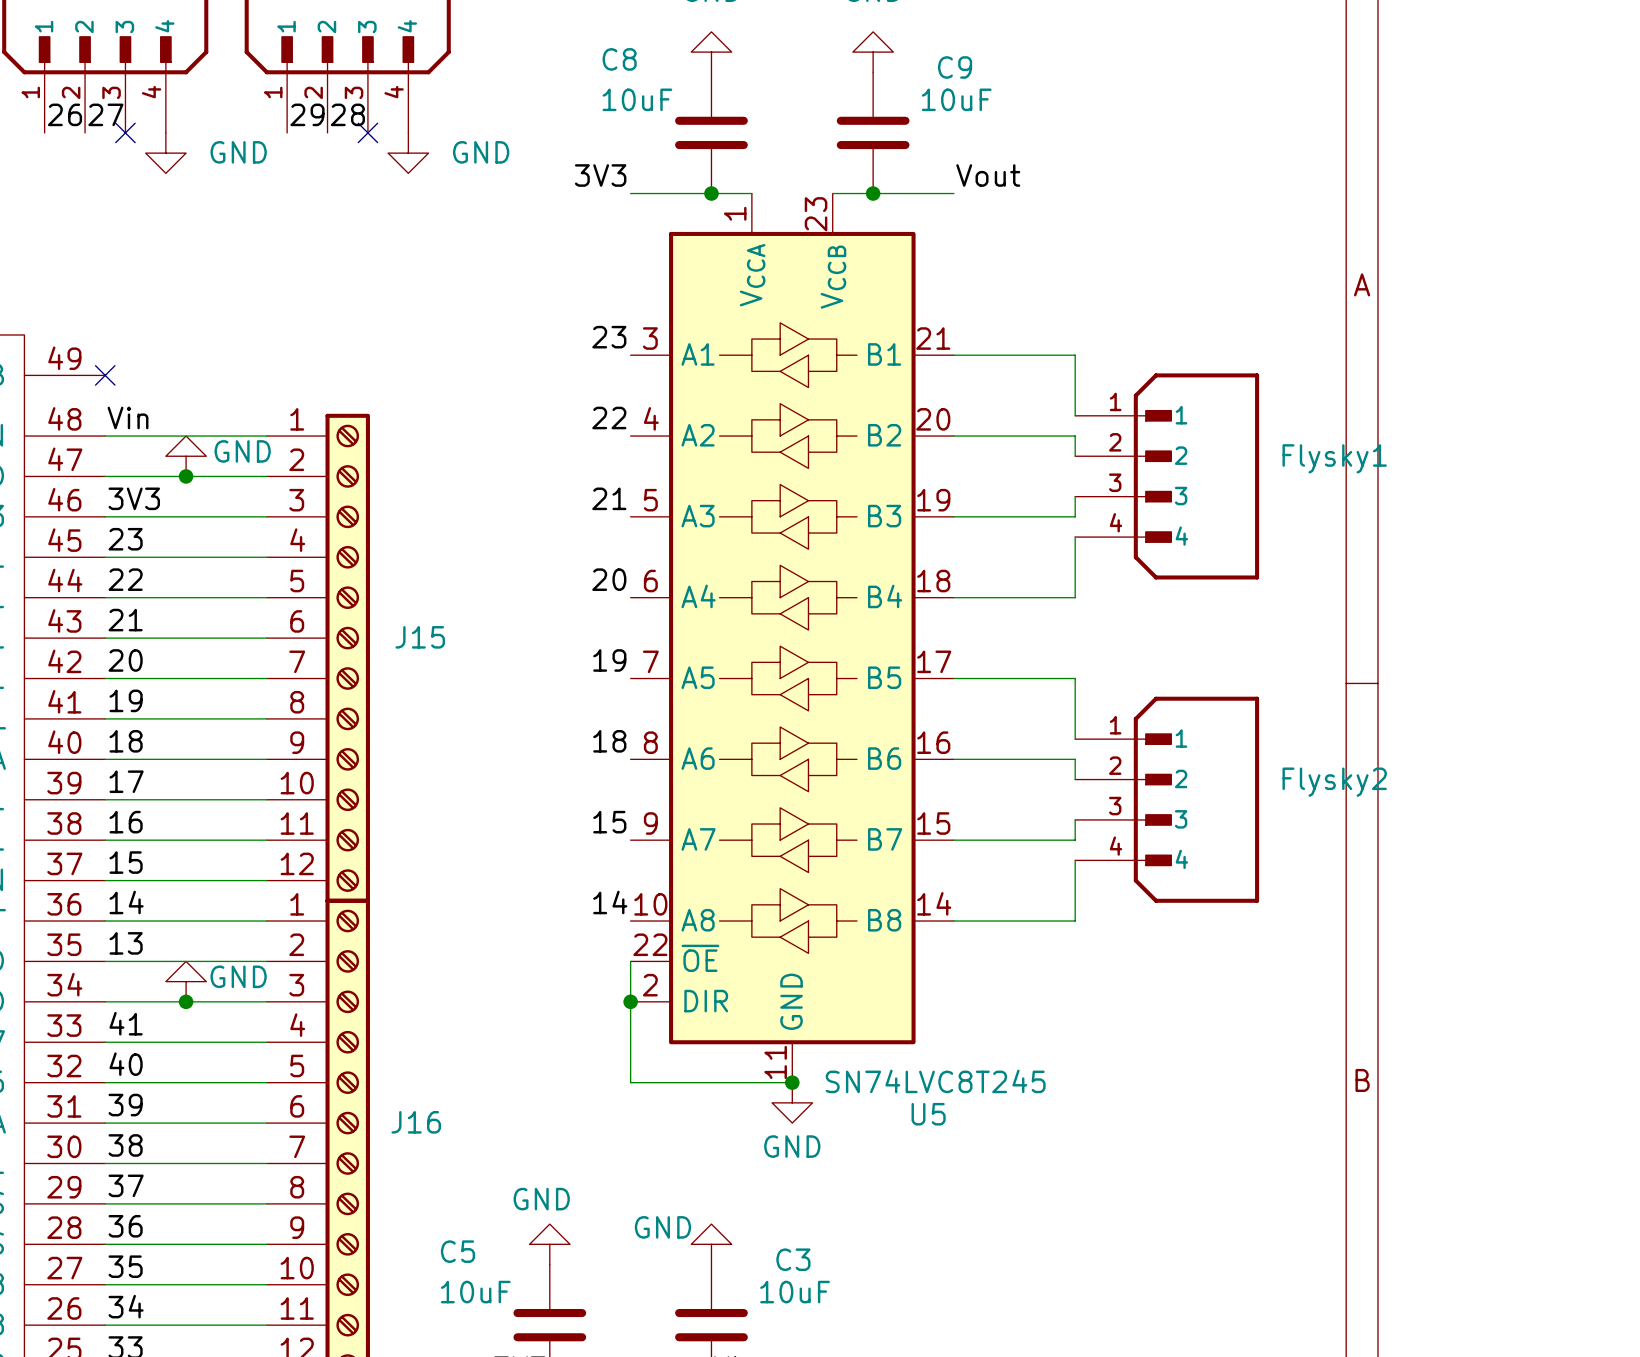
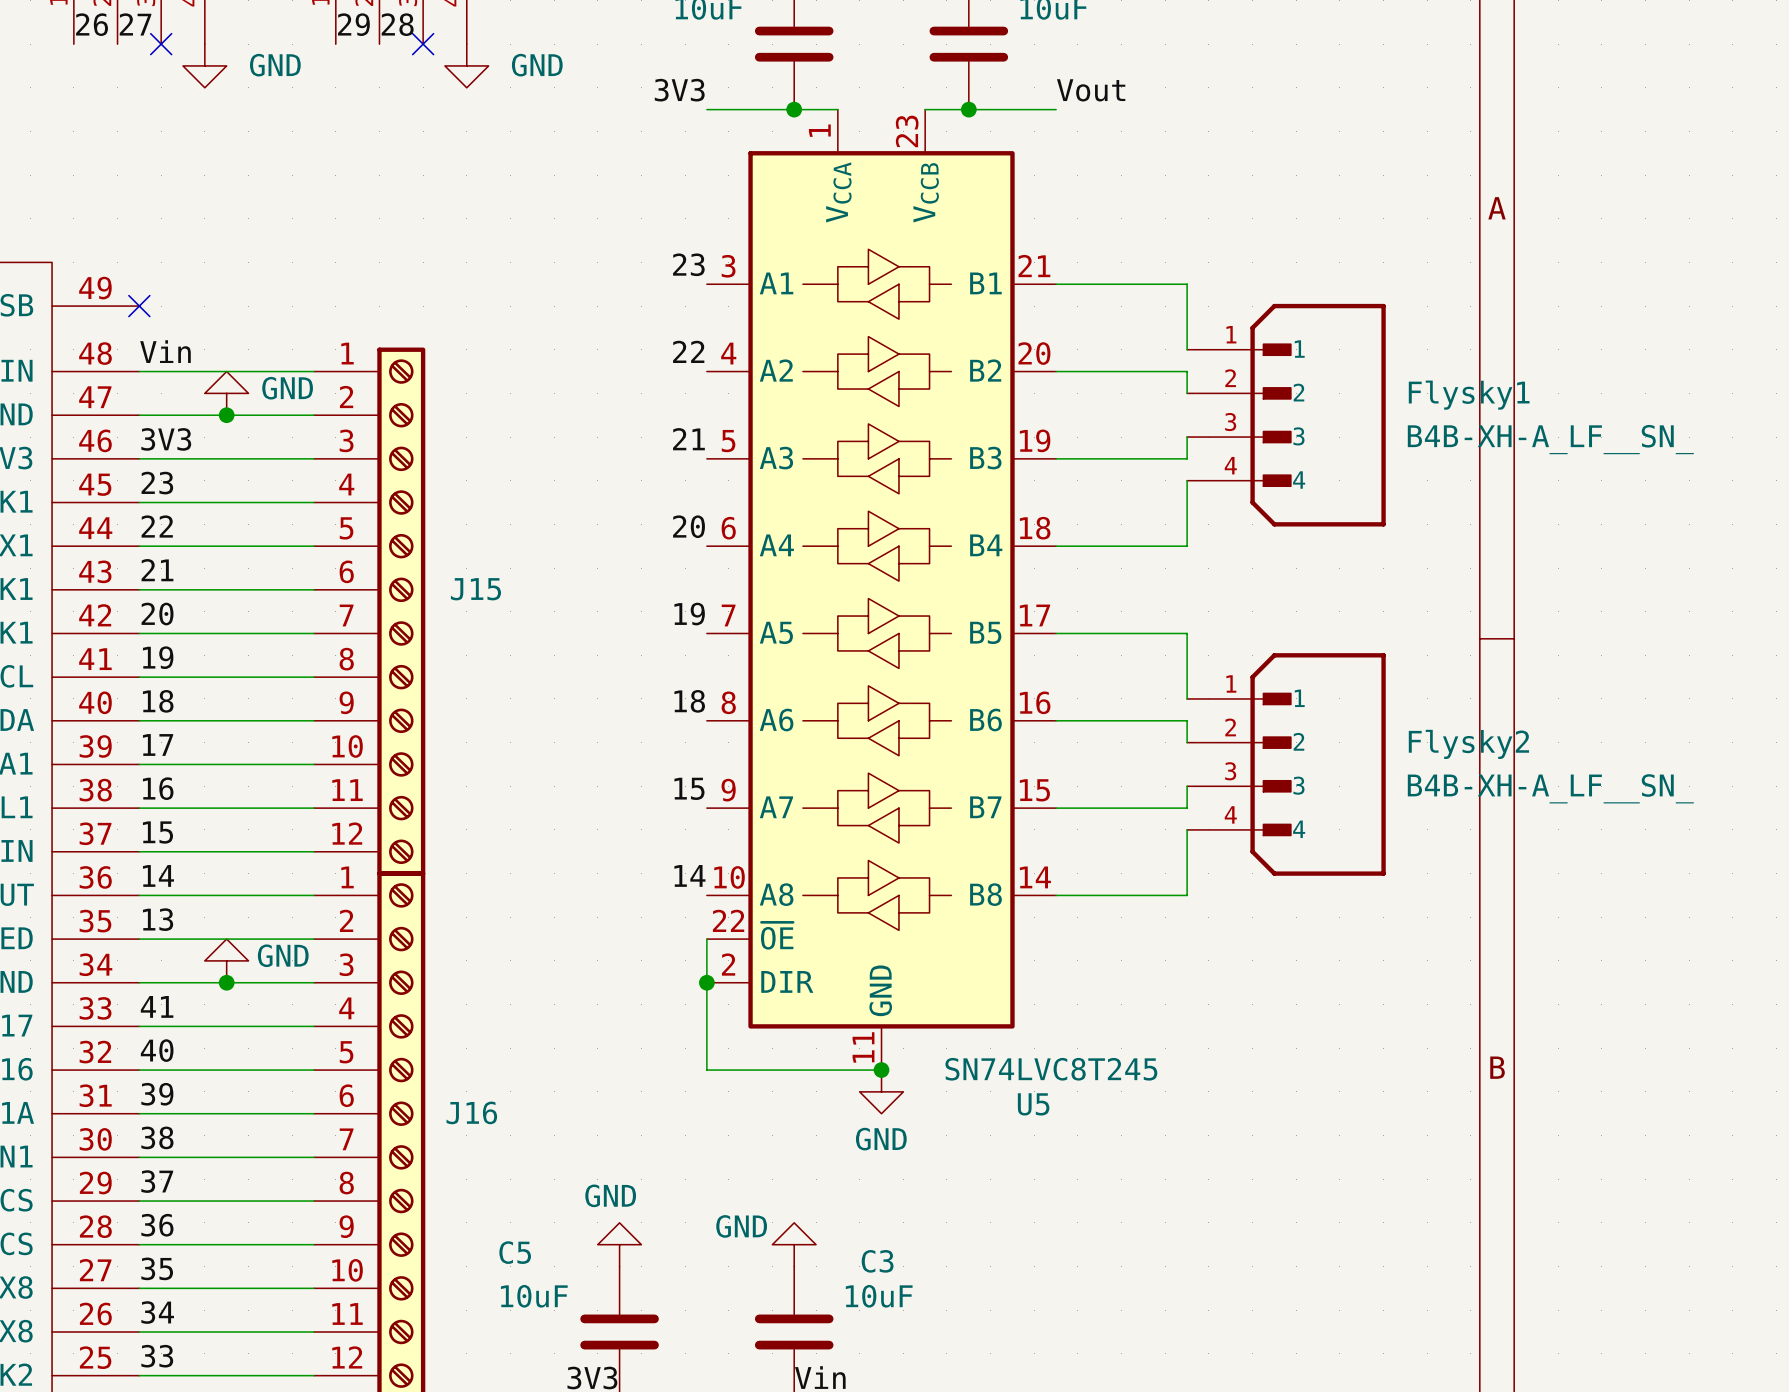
Flysky1 value: none -> B4B-XH-A_LF__SN_ (1550, 439)
Flysky2 value: none -> B4B-XH-A_LF__SN_ (1550, 788)

